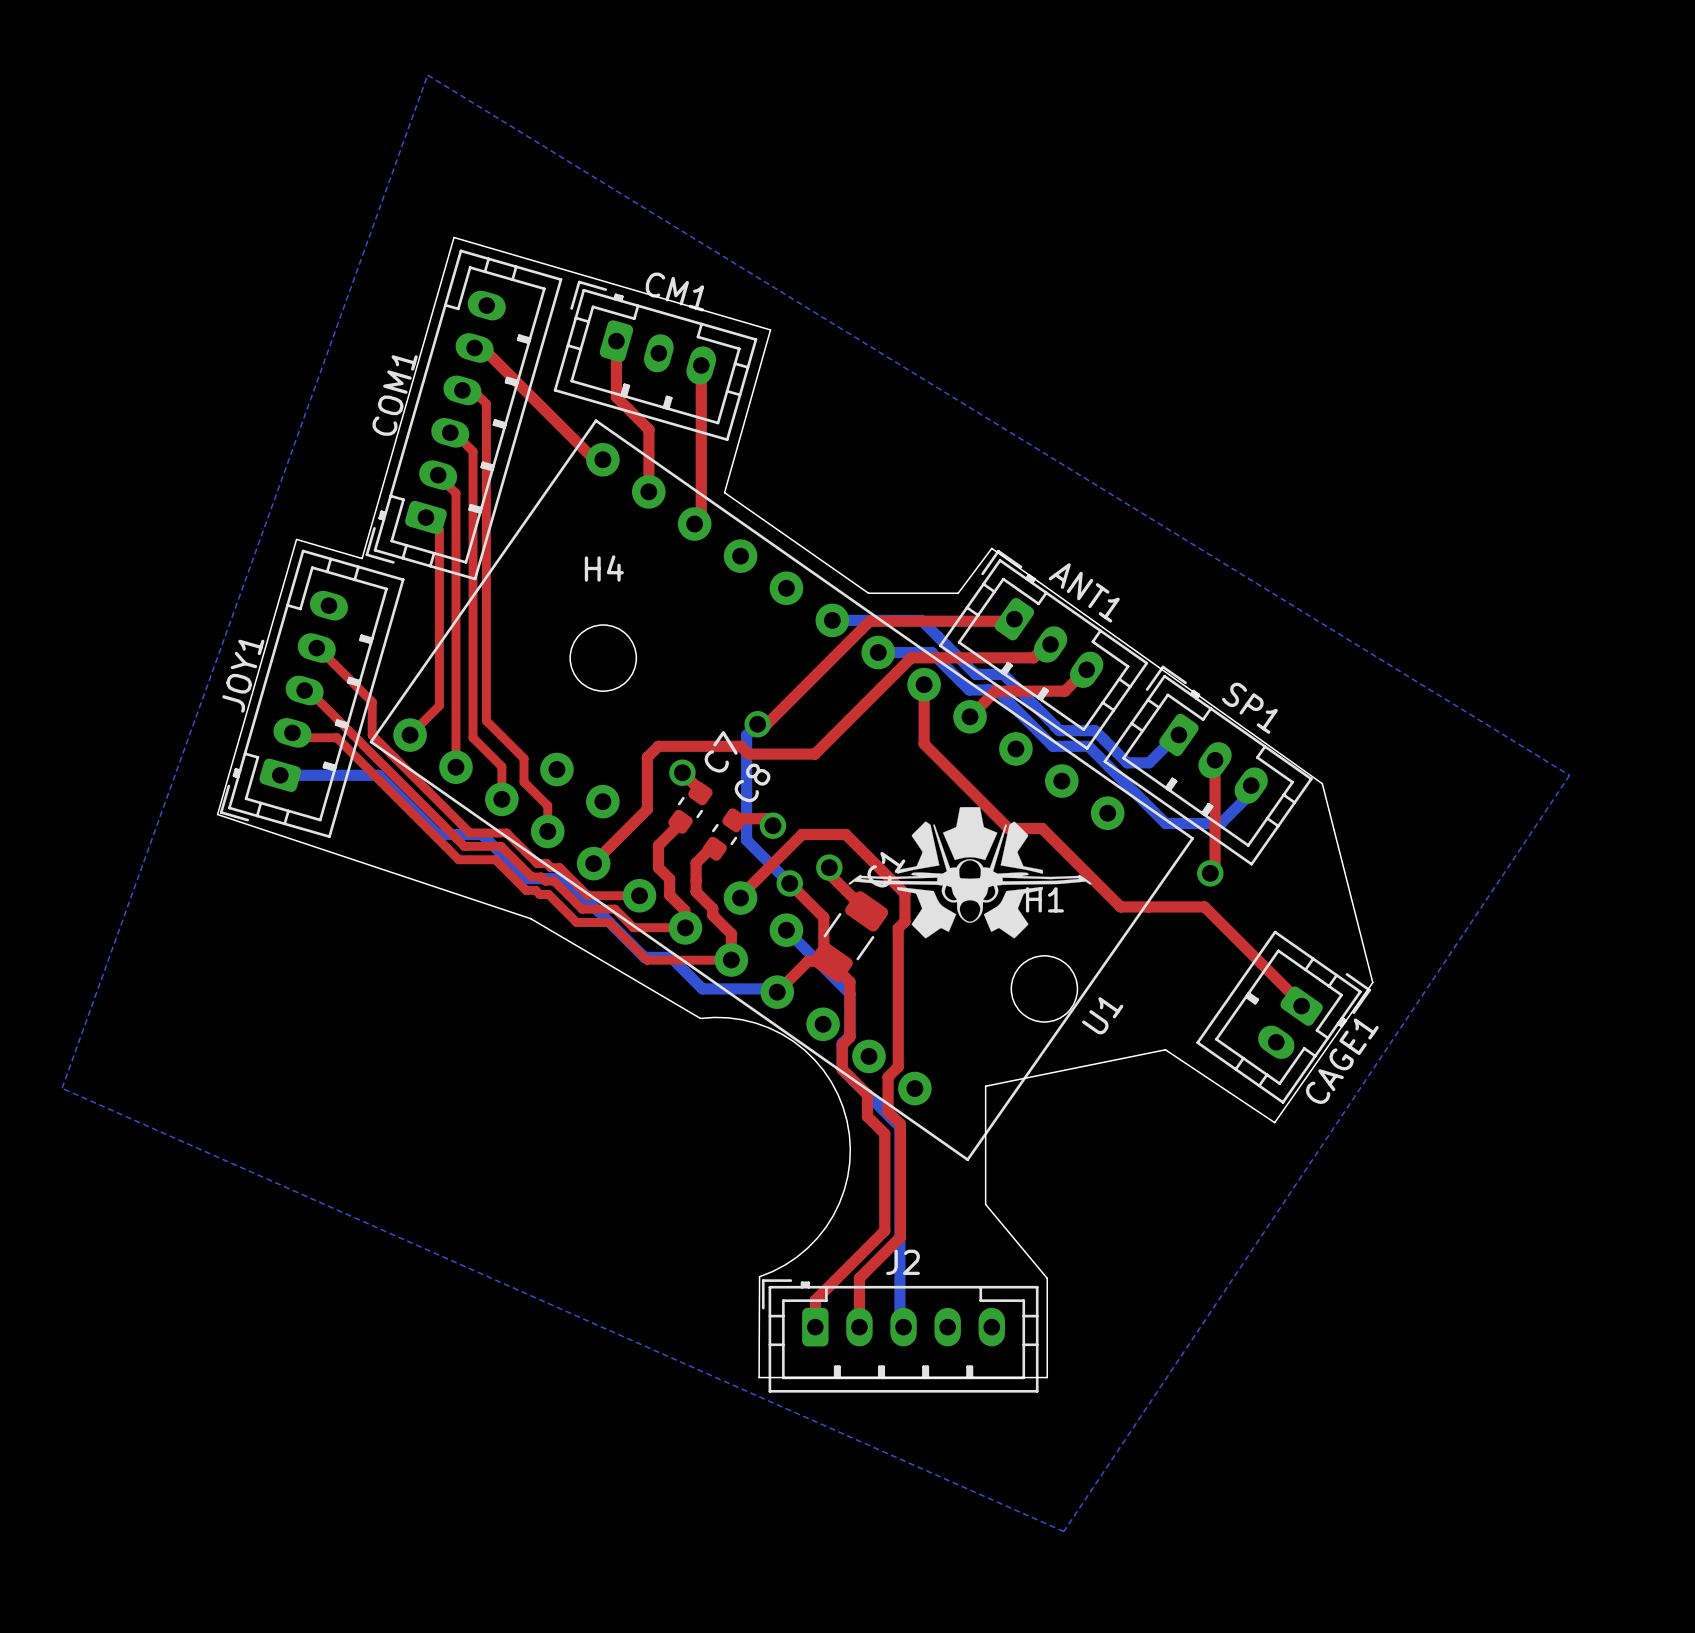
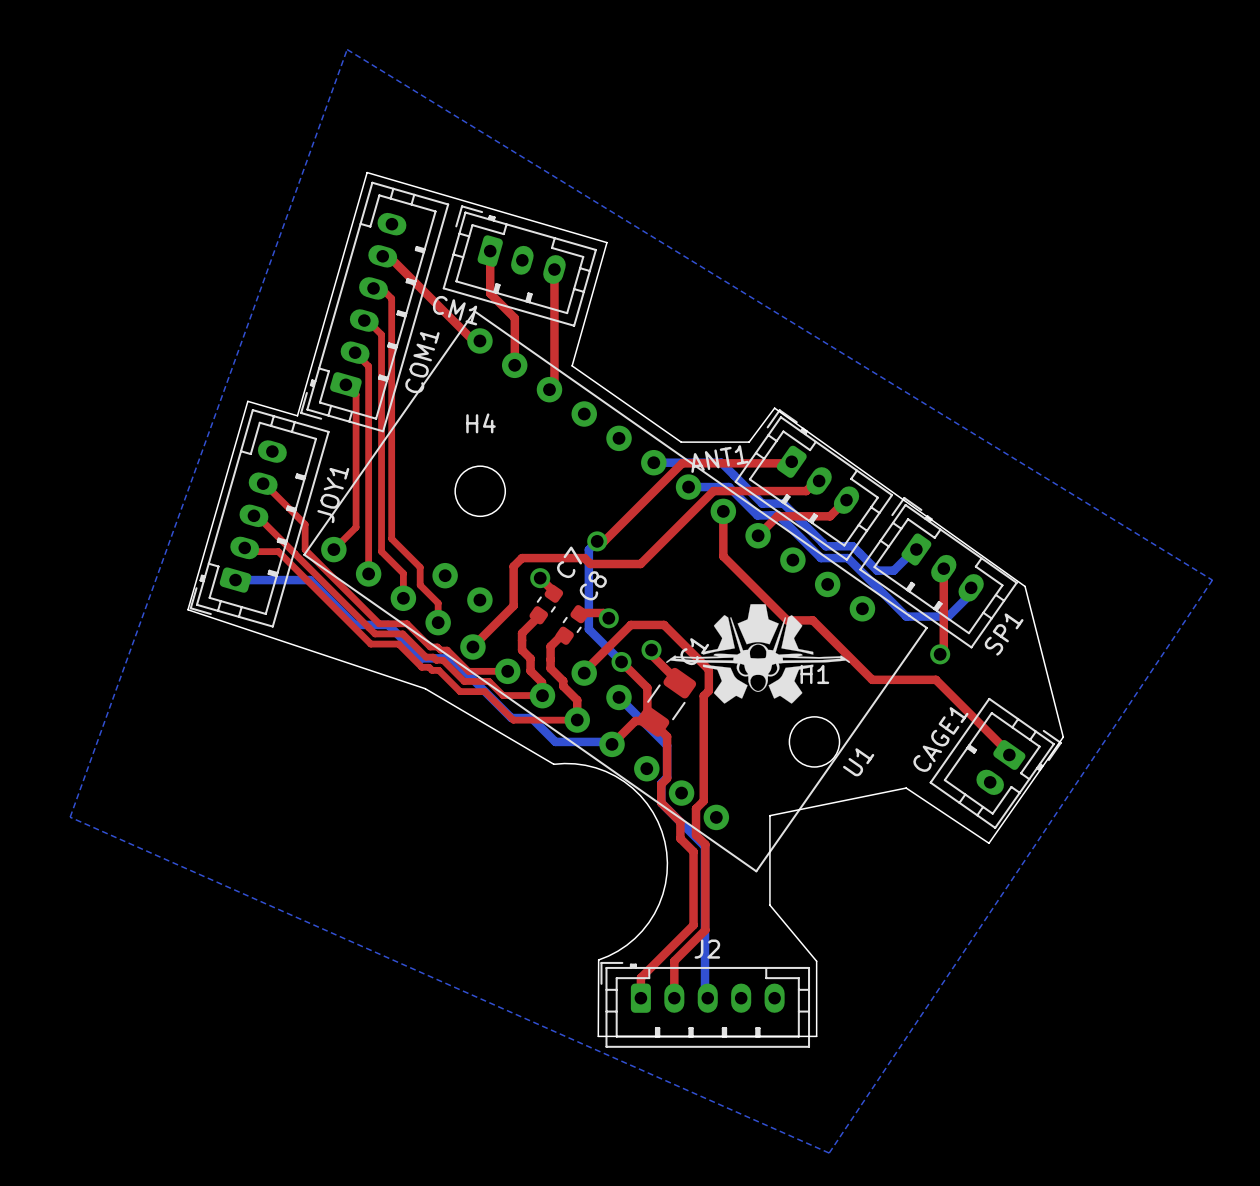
CM1 name position: CM1 (674, 292) -> CM1 (455, 310)
COM1 name position: COM1 (395, 395) -> COM1 (422, 362)
ANT1 name rotation: 0° (1084, 592) -> 45° counterclockwise (719, 459)
ANT1 name position: ANT1 (1084, 592) -> ANT1 (719, 459)
JOY1 name position: JOY1 (243, 676) -> JOY1 (333, 495)
SP1 name rotation: 0° (1249, 708) -> 90° counterclockwise (1004, 634)
SP1 name position: SP1 (1249, 708) -> SP1 (1004, 634)
CAGE1 name position: CAGE1 (1342, 1061) -> CAGE1 (940, 739)

